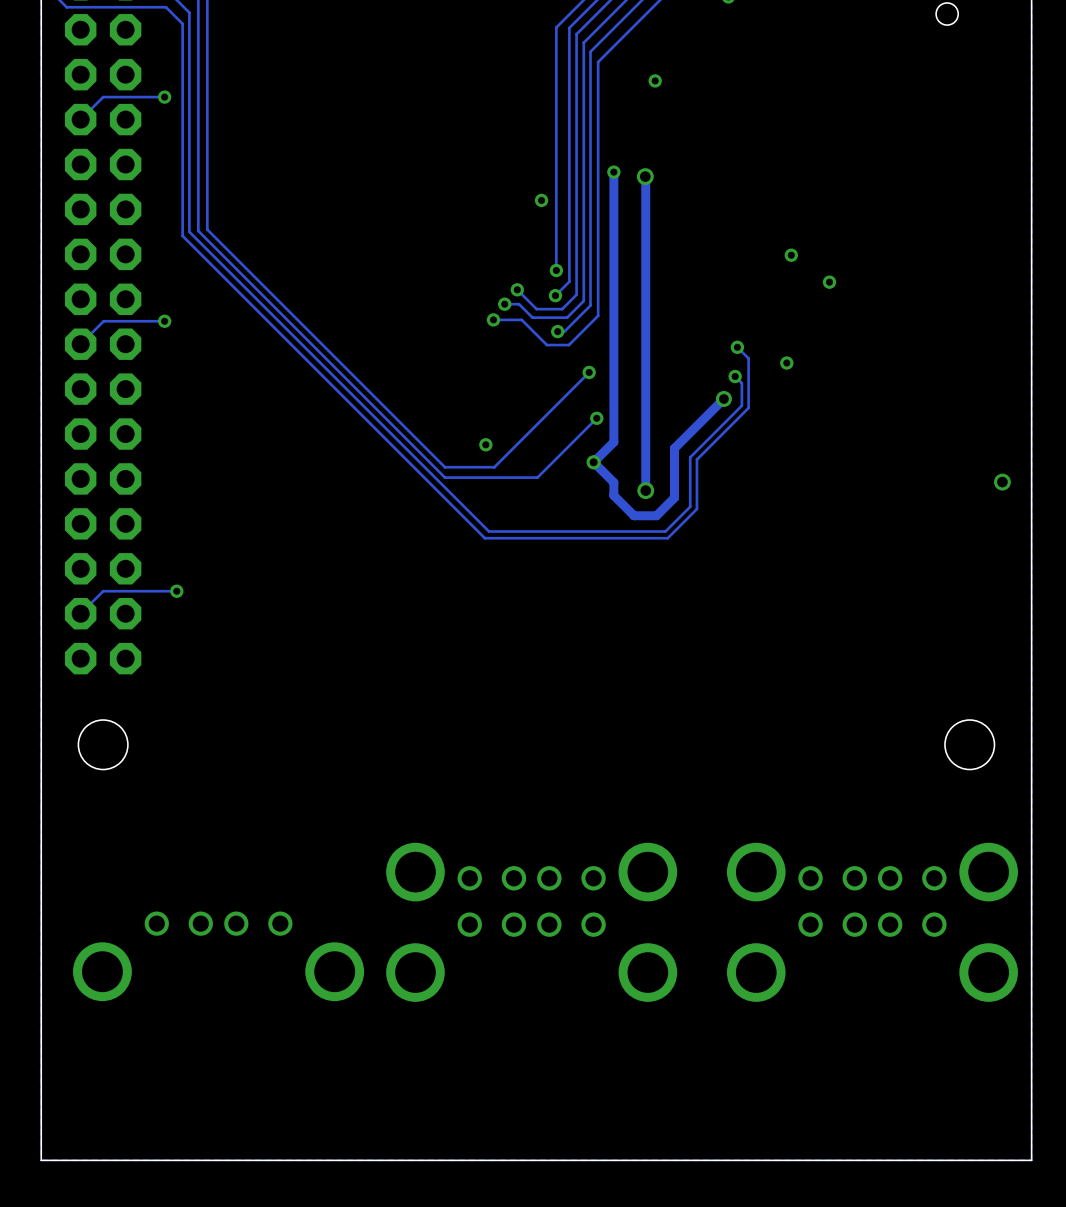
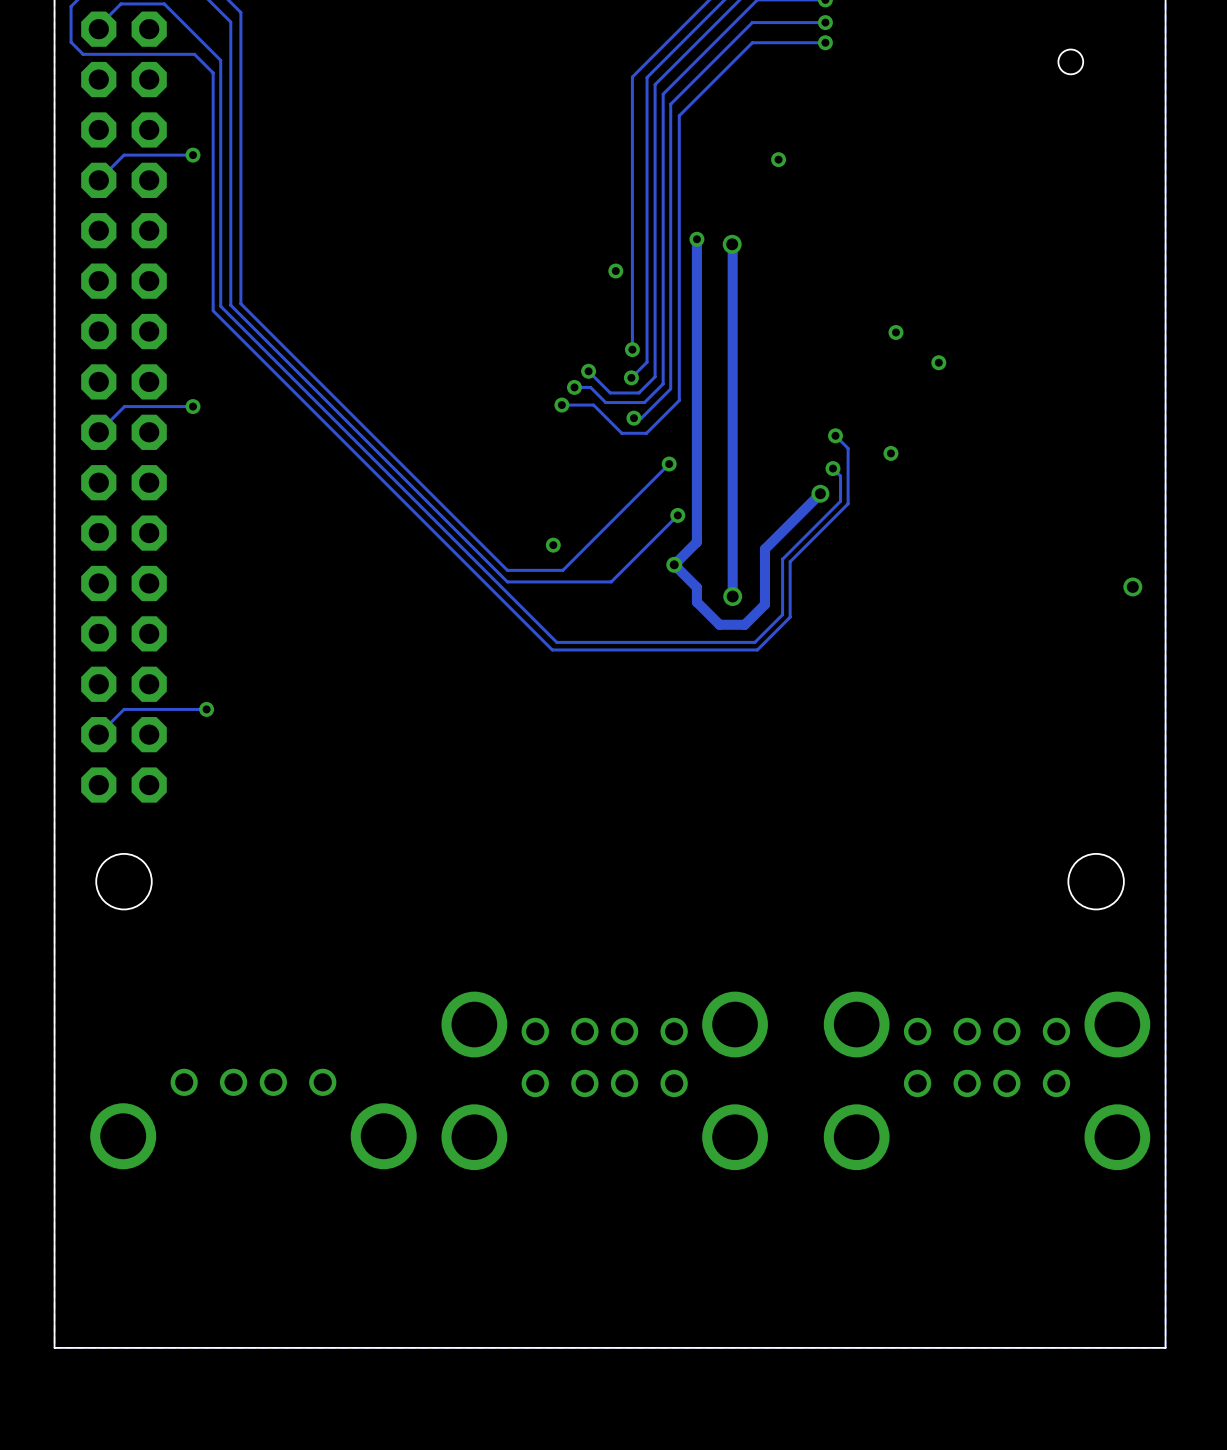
via position: (655, 80) -> (778, 159)

